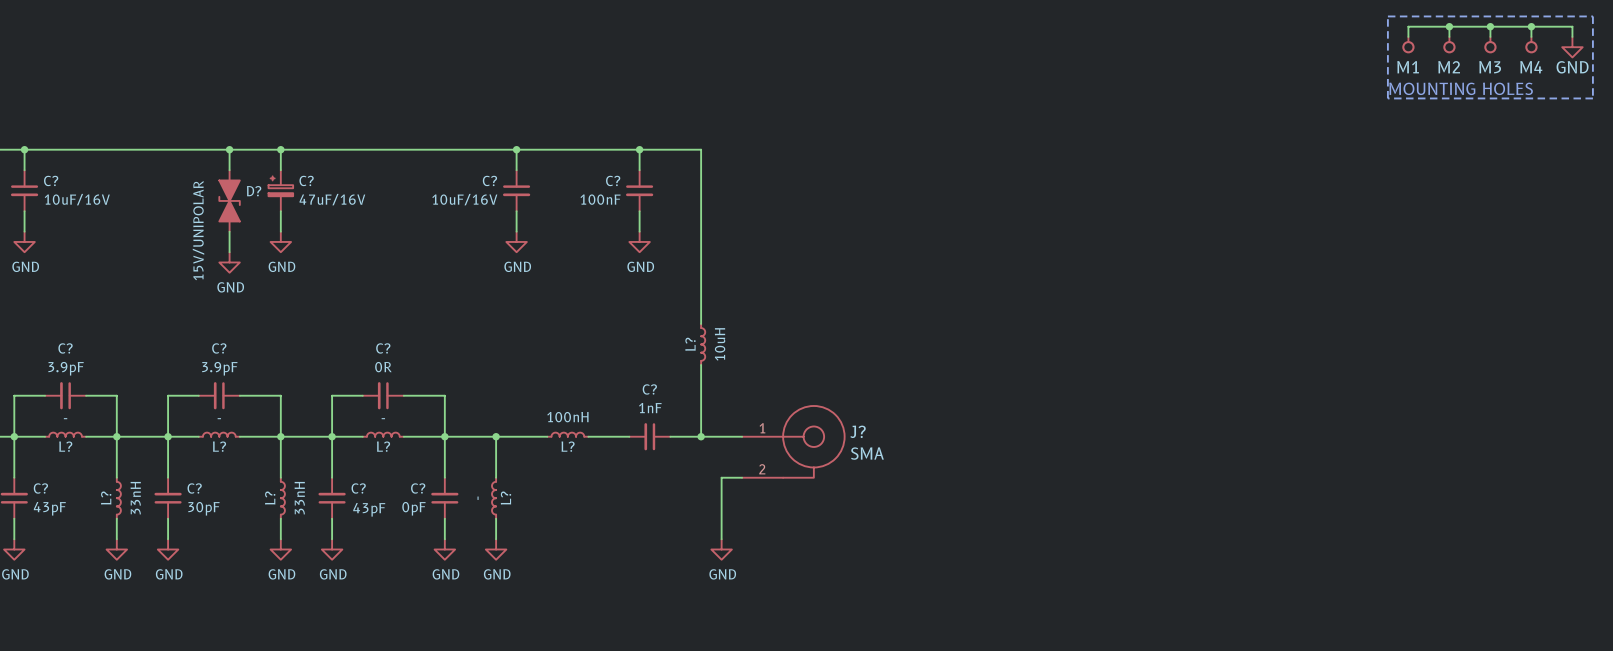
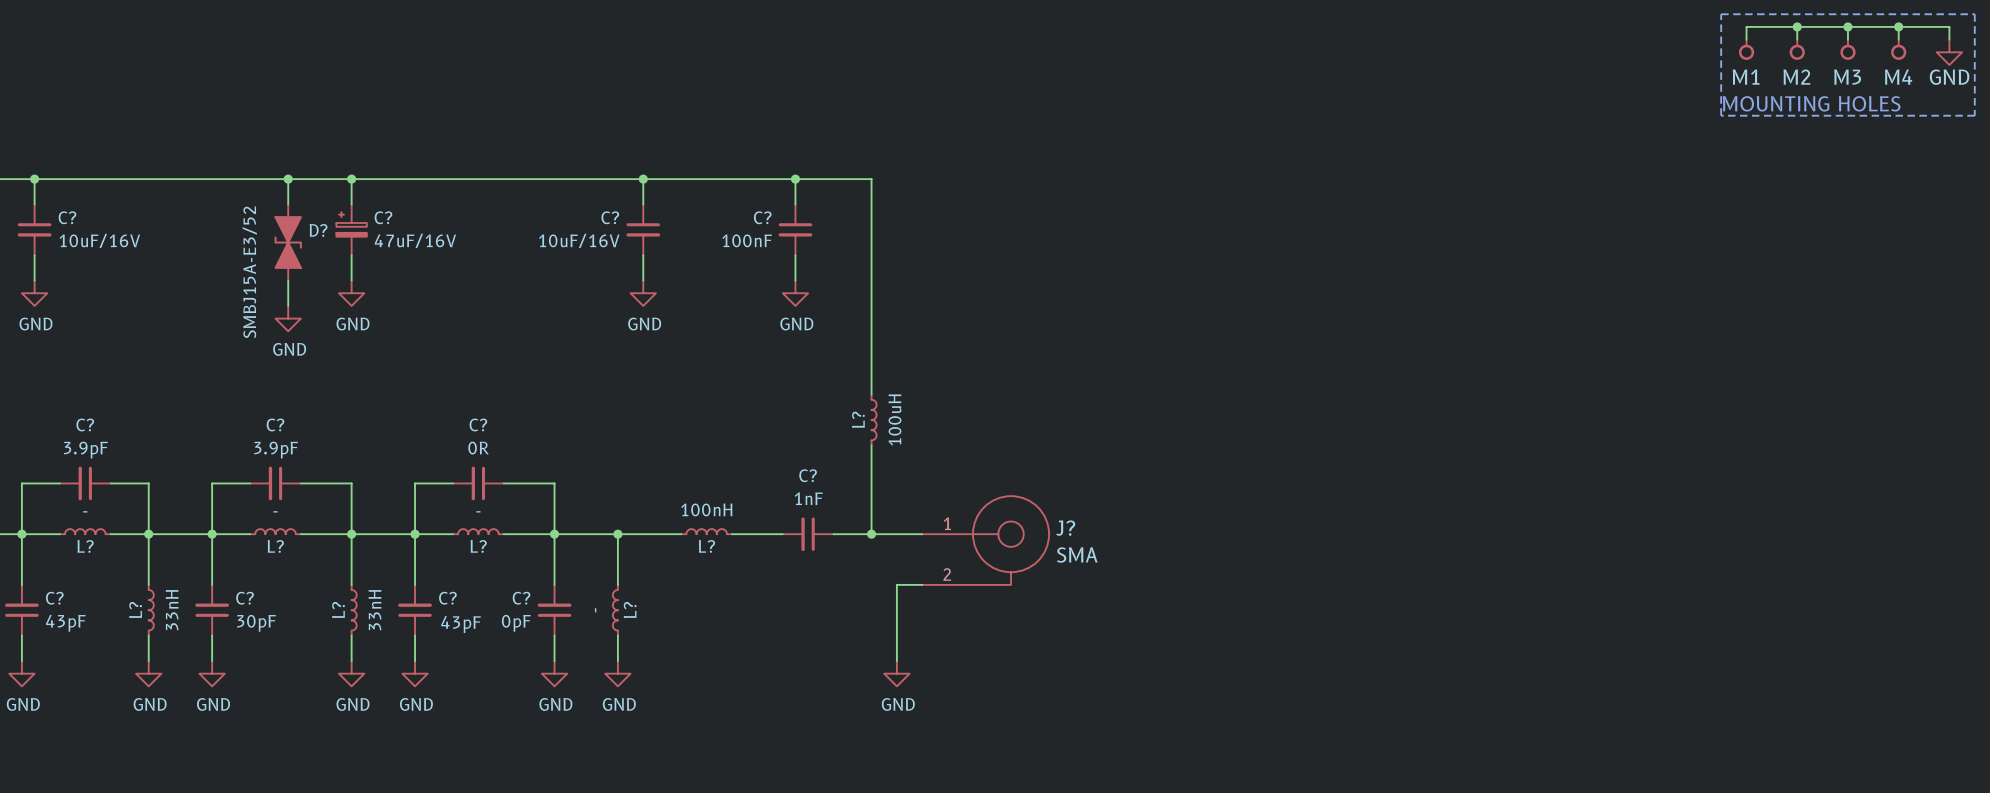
D? value: 15V/UNIPOLAR (198, 230) -> SMBJ15A-E3/52 (249, 272)
L? value: 10uH (720, 344) -> 100uH (894, 419)

